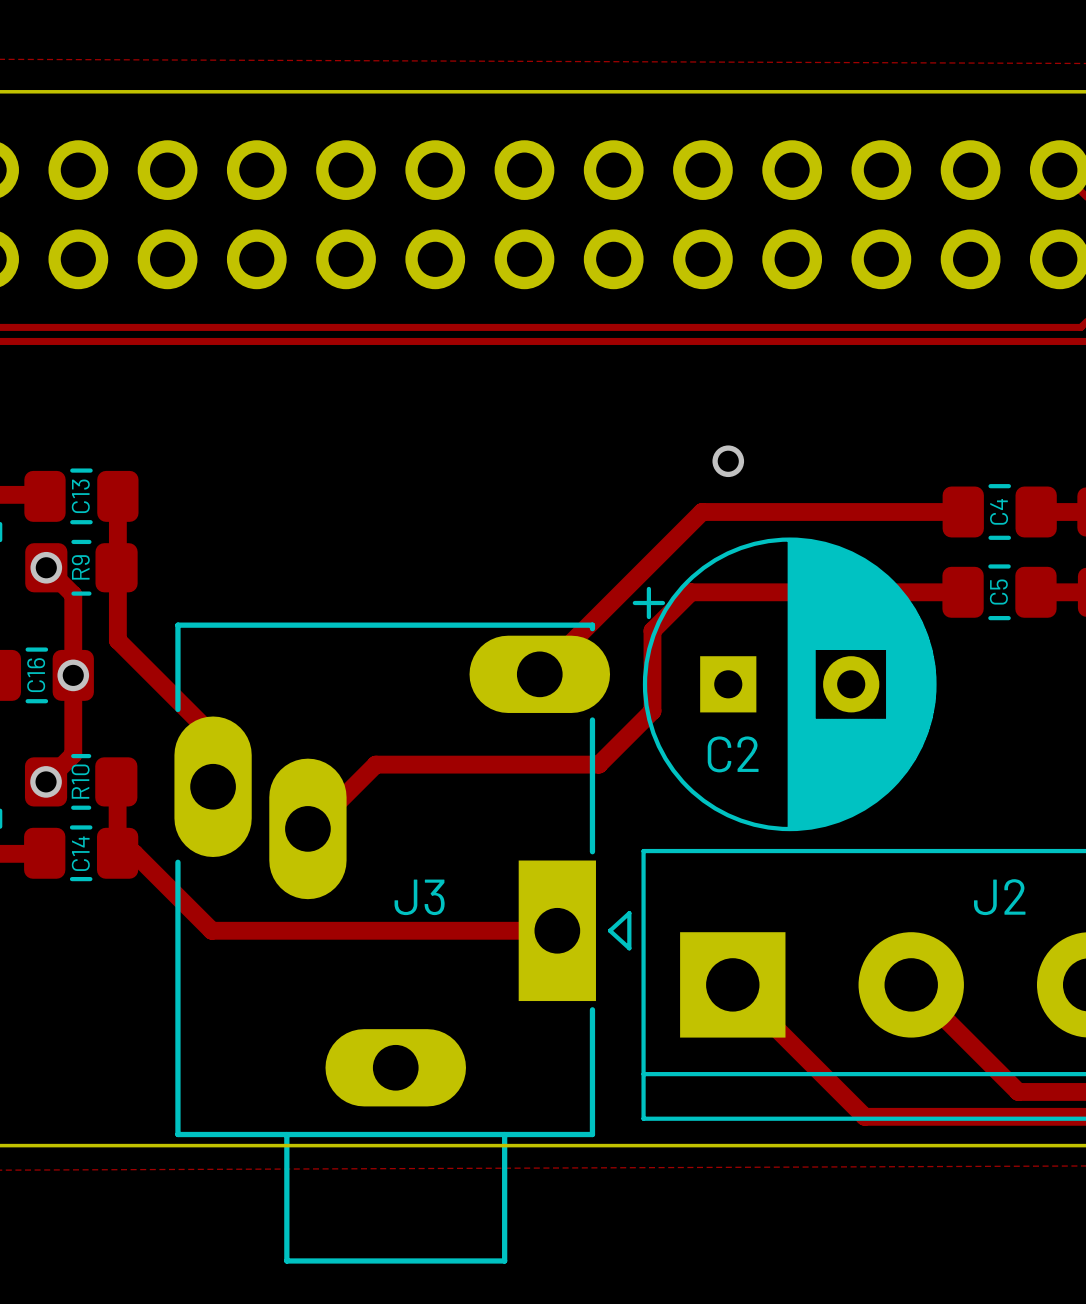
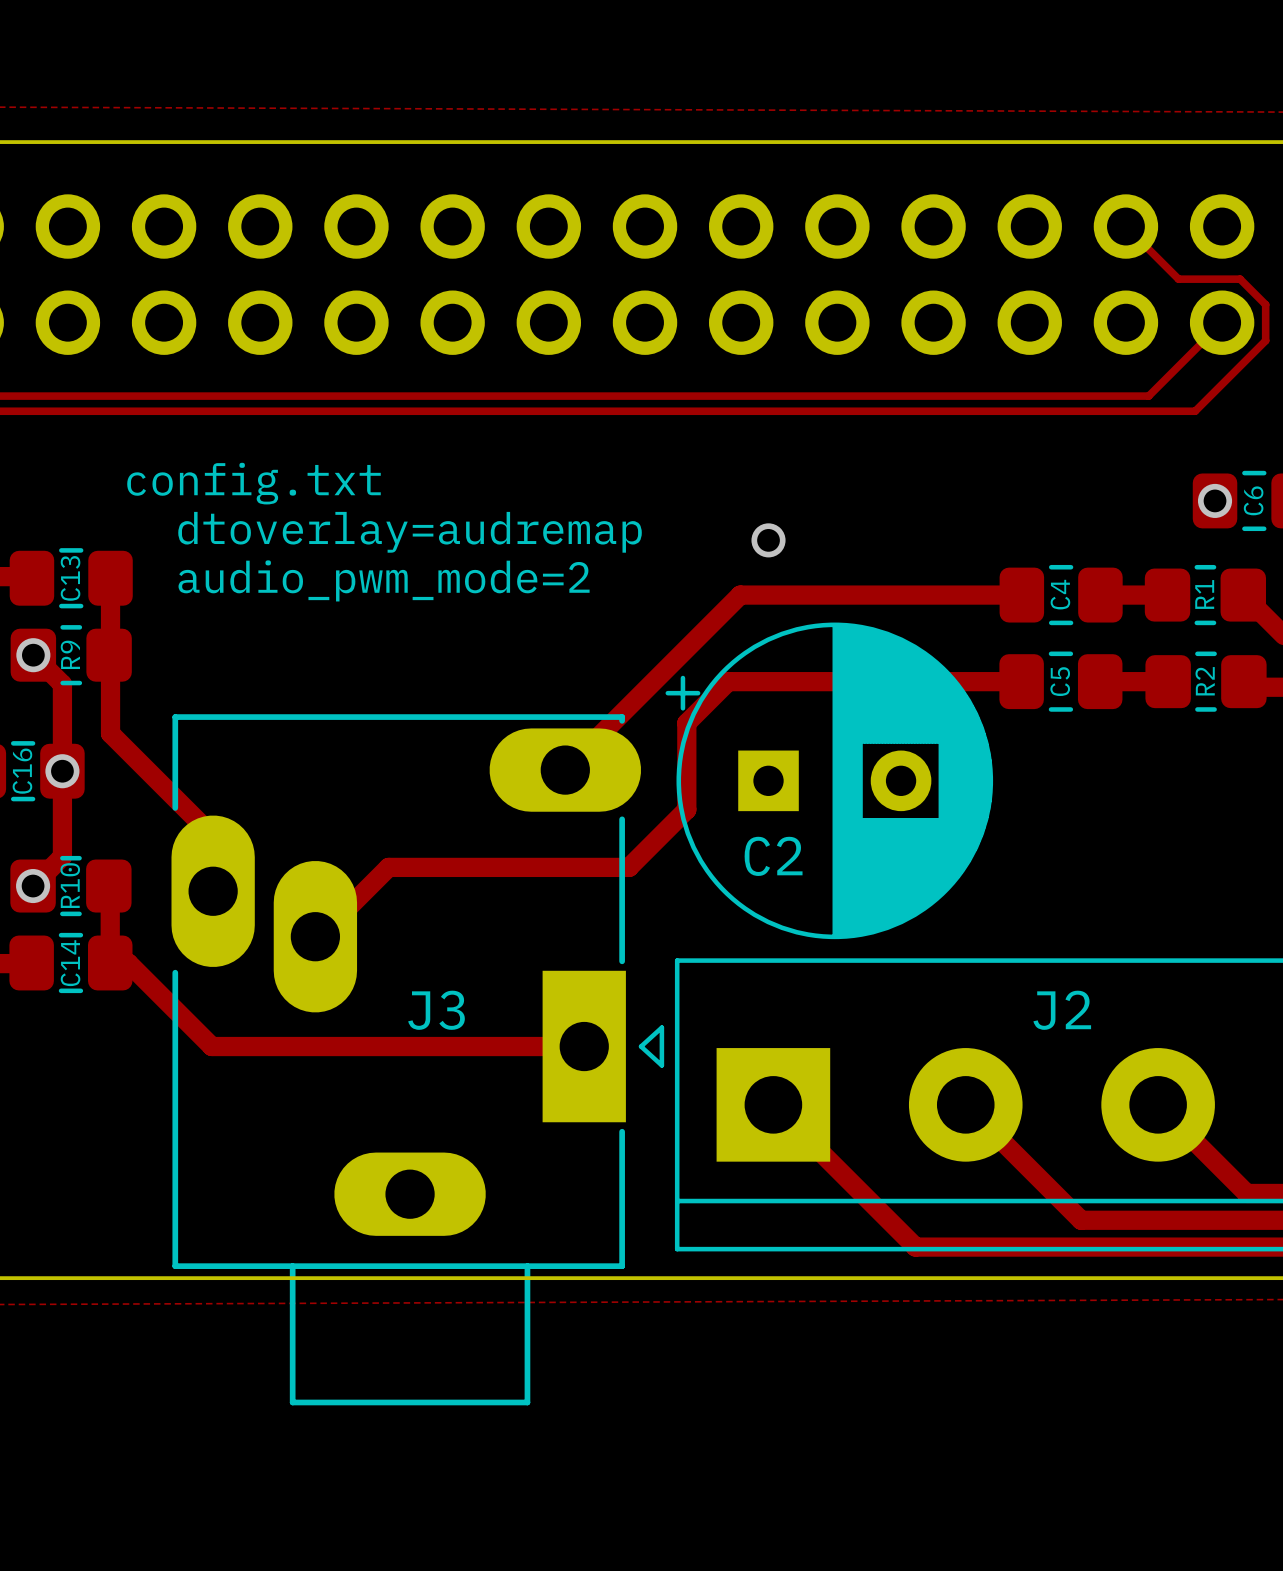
text: none -> config.txt (254, 483)
text: none -> dtoverlay=audremap (410, 532)
text: none -> audio_pwm_mode=2 (384, 580)

